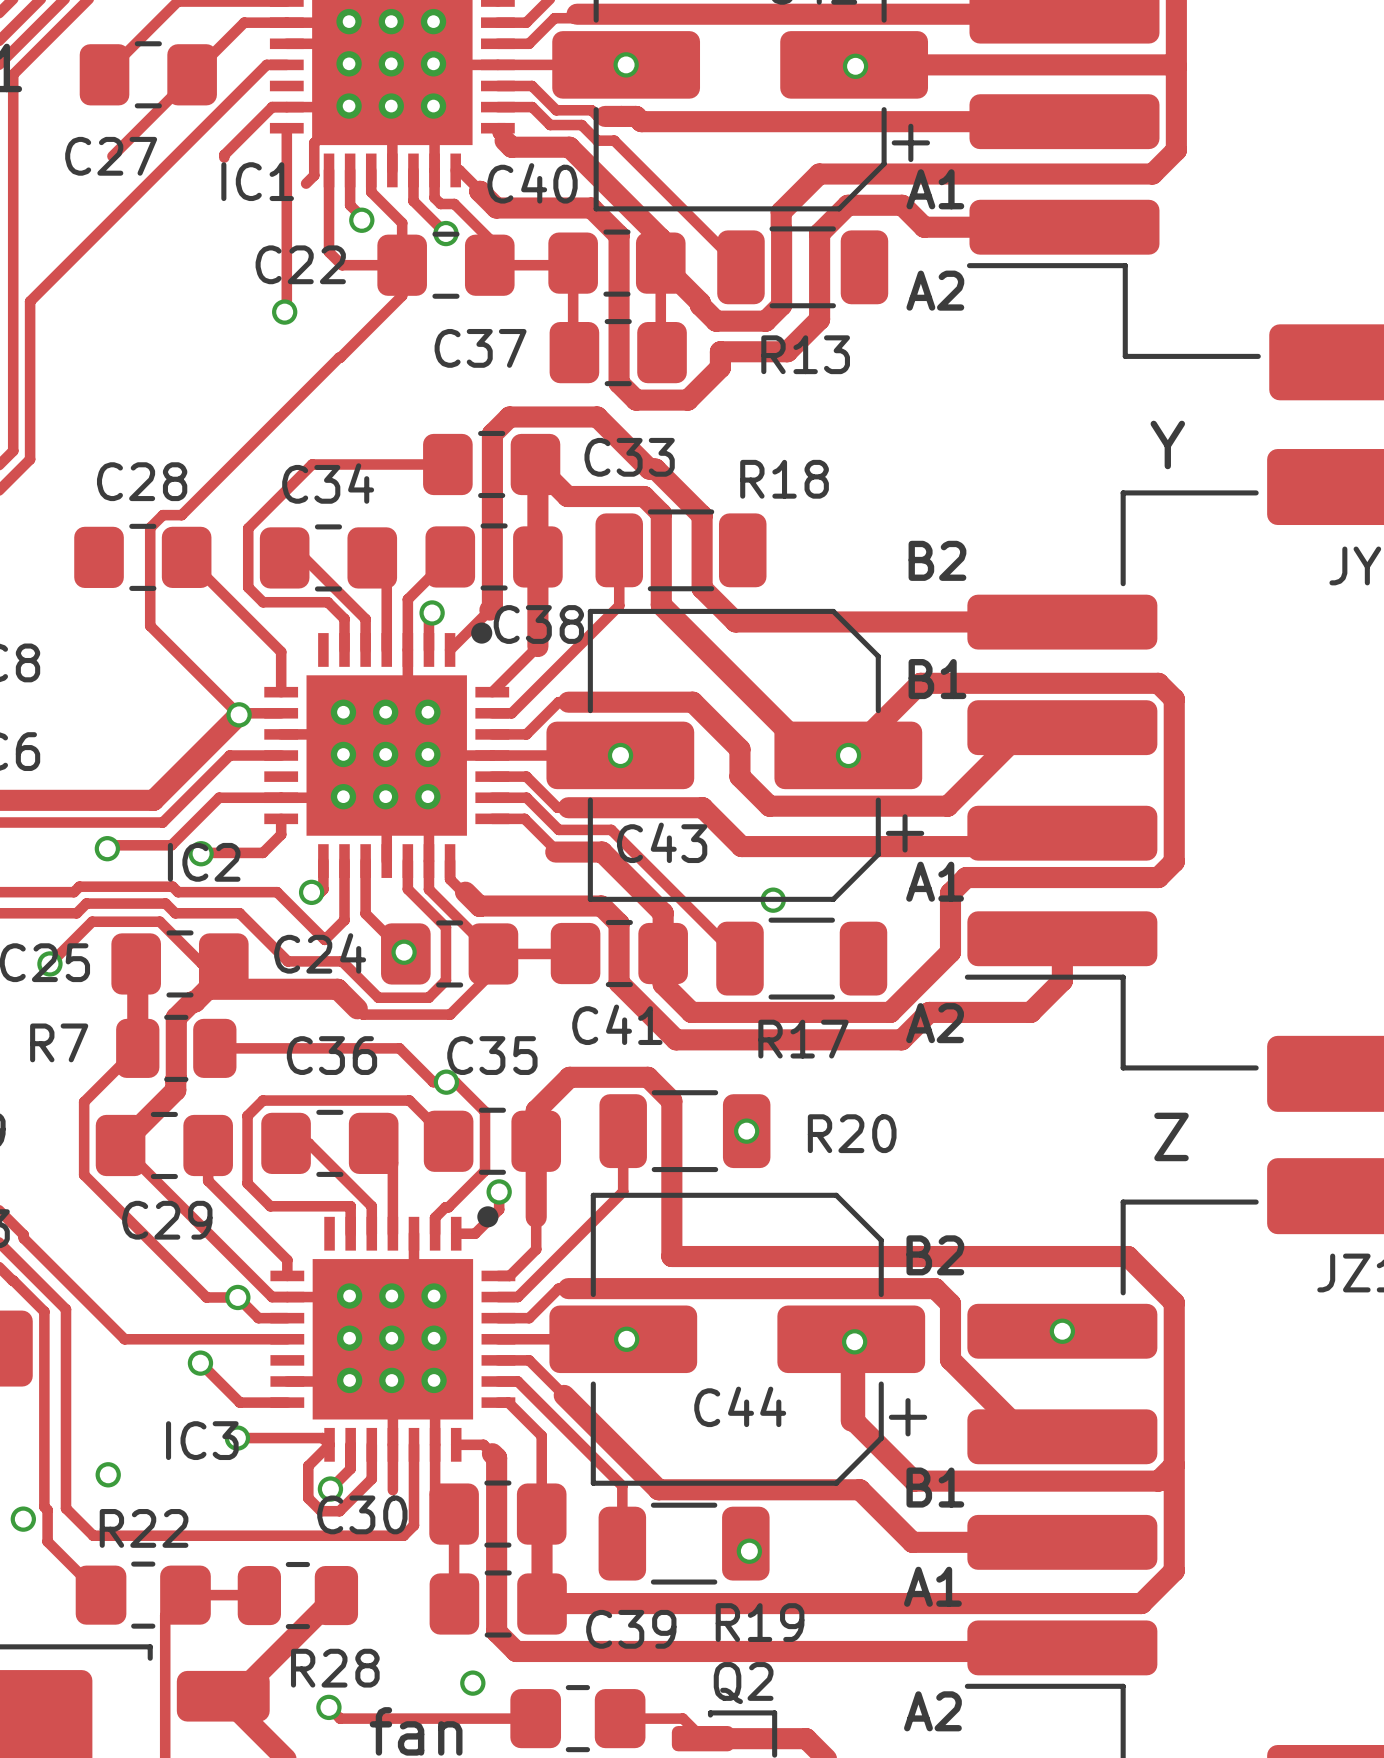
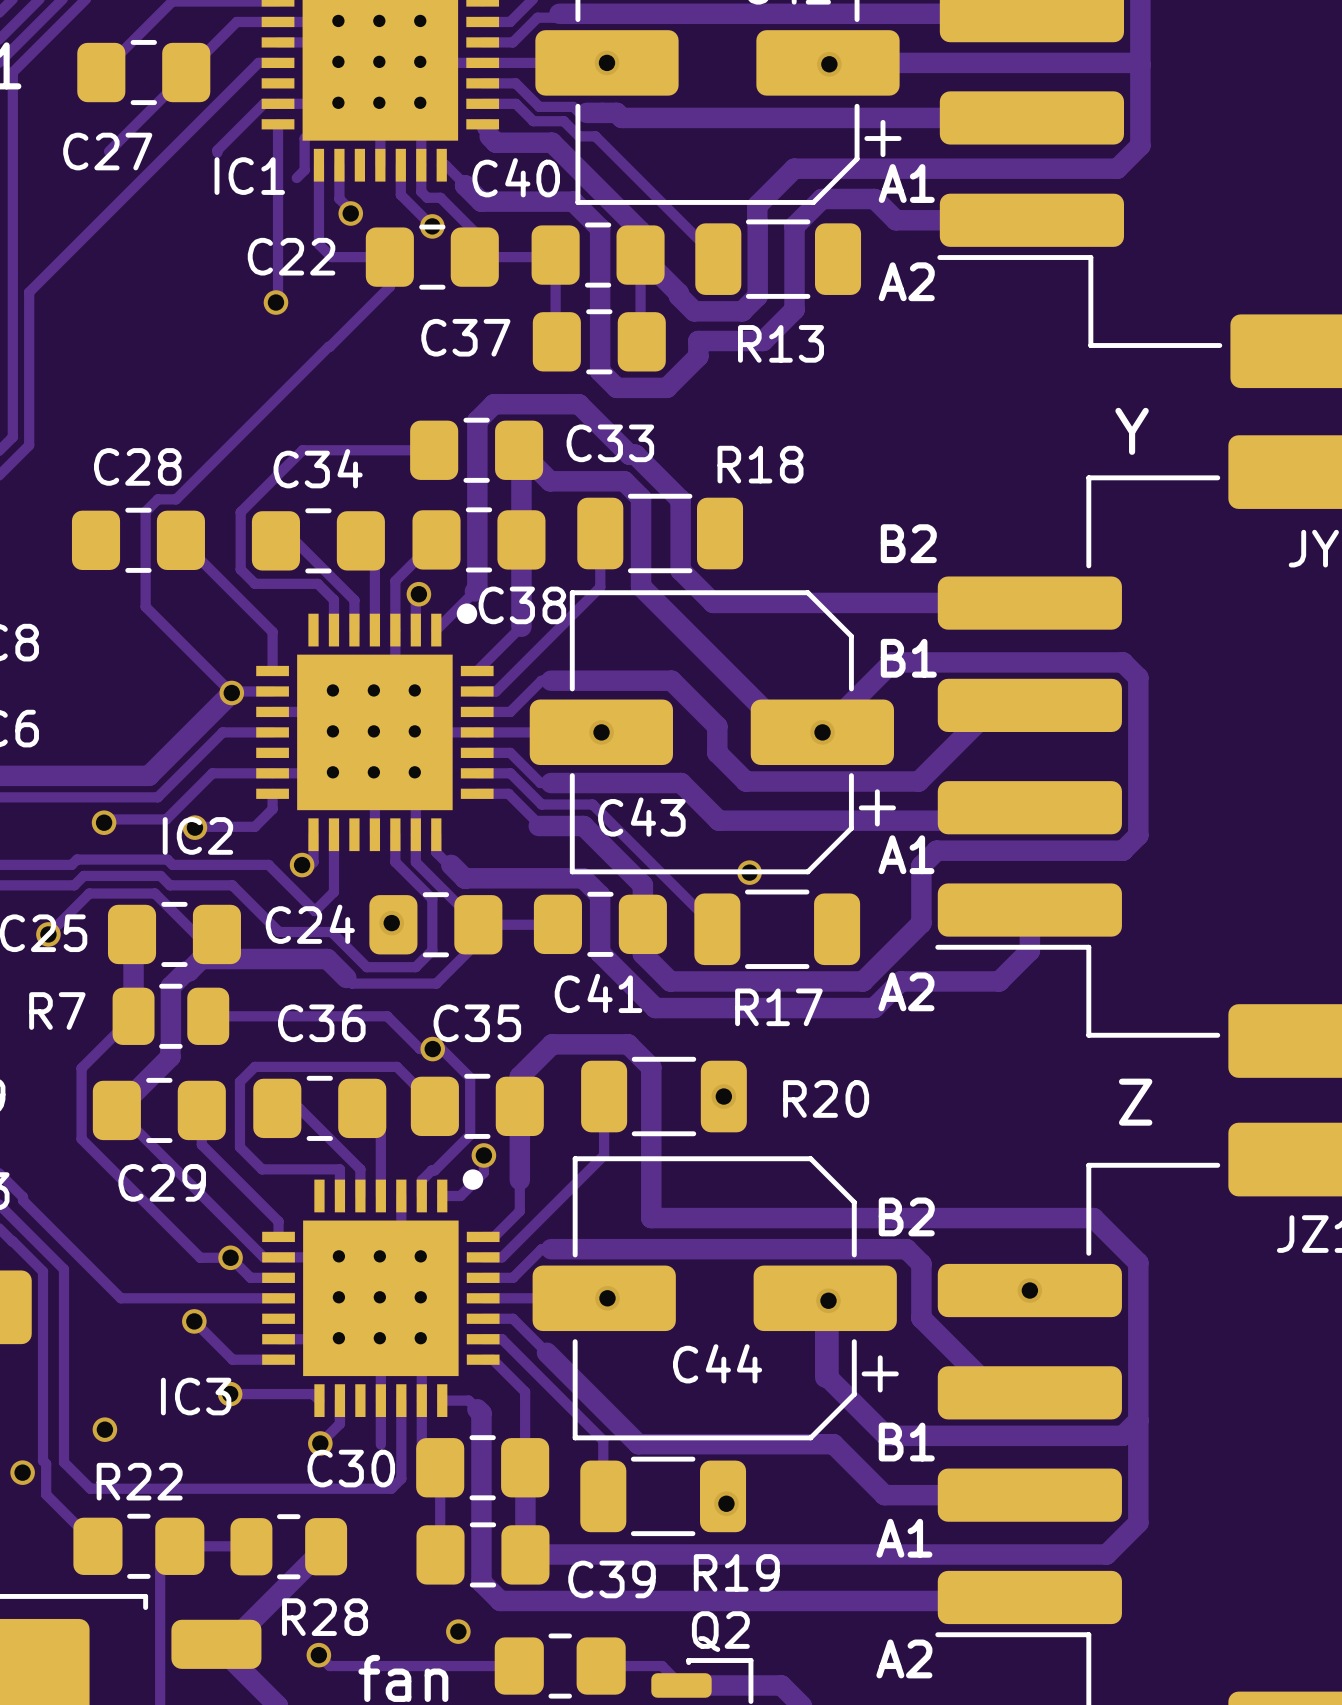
track: (371, 170) (371, 192) (402, 223) (402, 265) -> none
track: (365, 861) (365, 913) (404, 952) -> none
track: (329, 1444) (308, 1466) (308, 1498) (321, 1511) (339, 1511) (371, 1479) (371, 1444) -> none

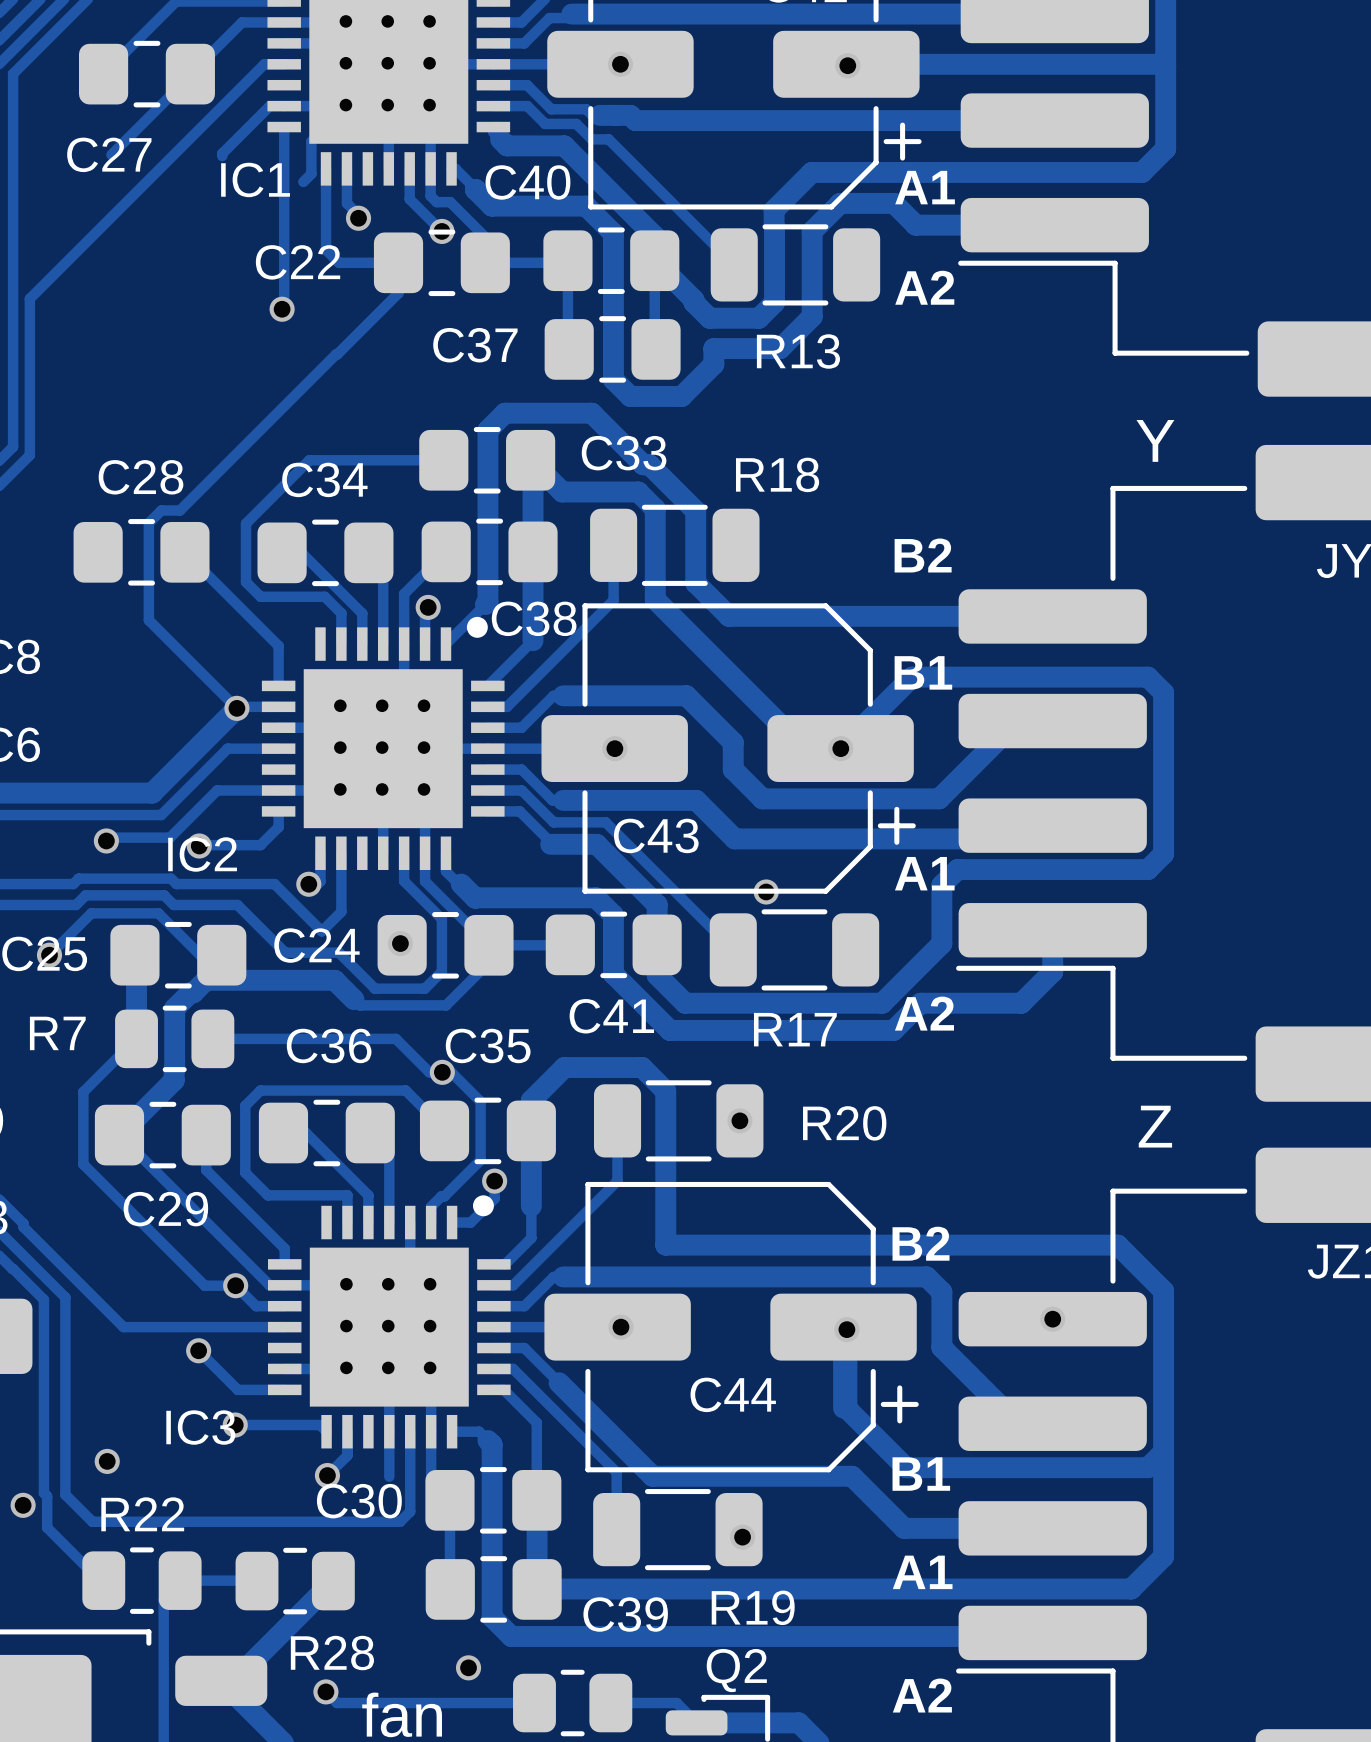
R22 footprint: [73, 1513, 205, 1579] -> [82, 1547, 202, 1614]
part footprint: [494, 1633, 626, 1699] -> [513, 1669, 633, 1737]

